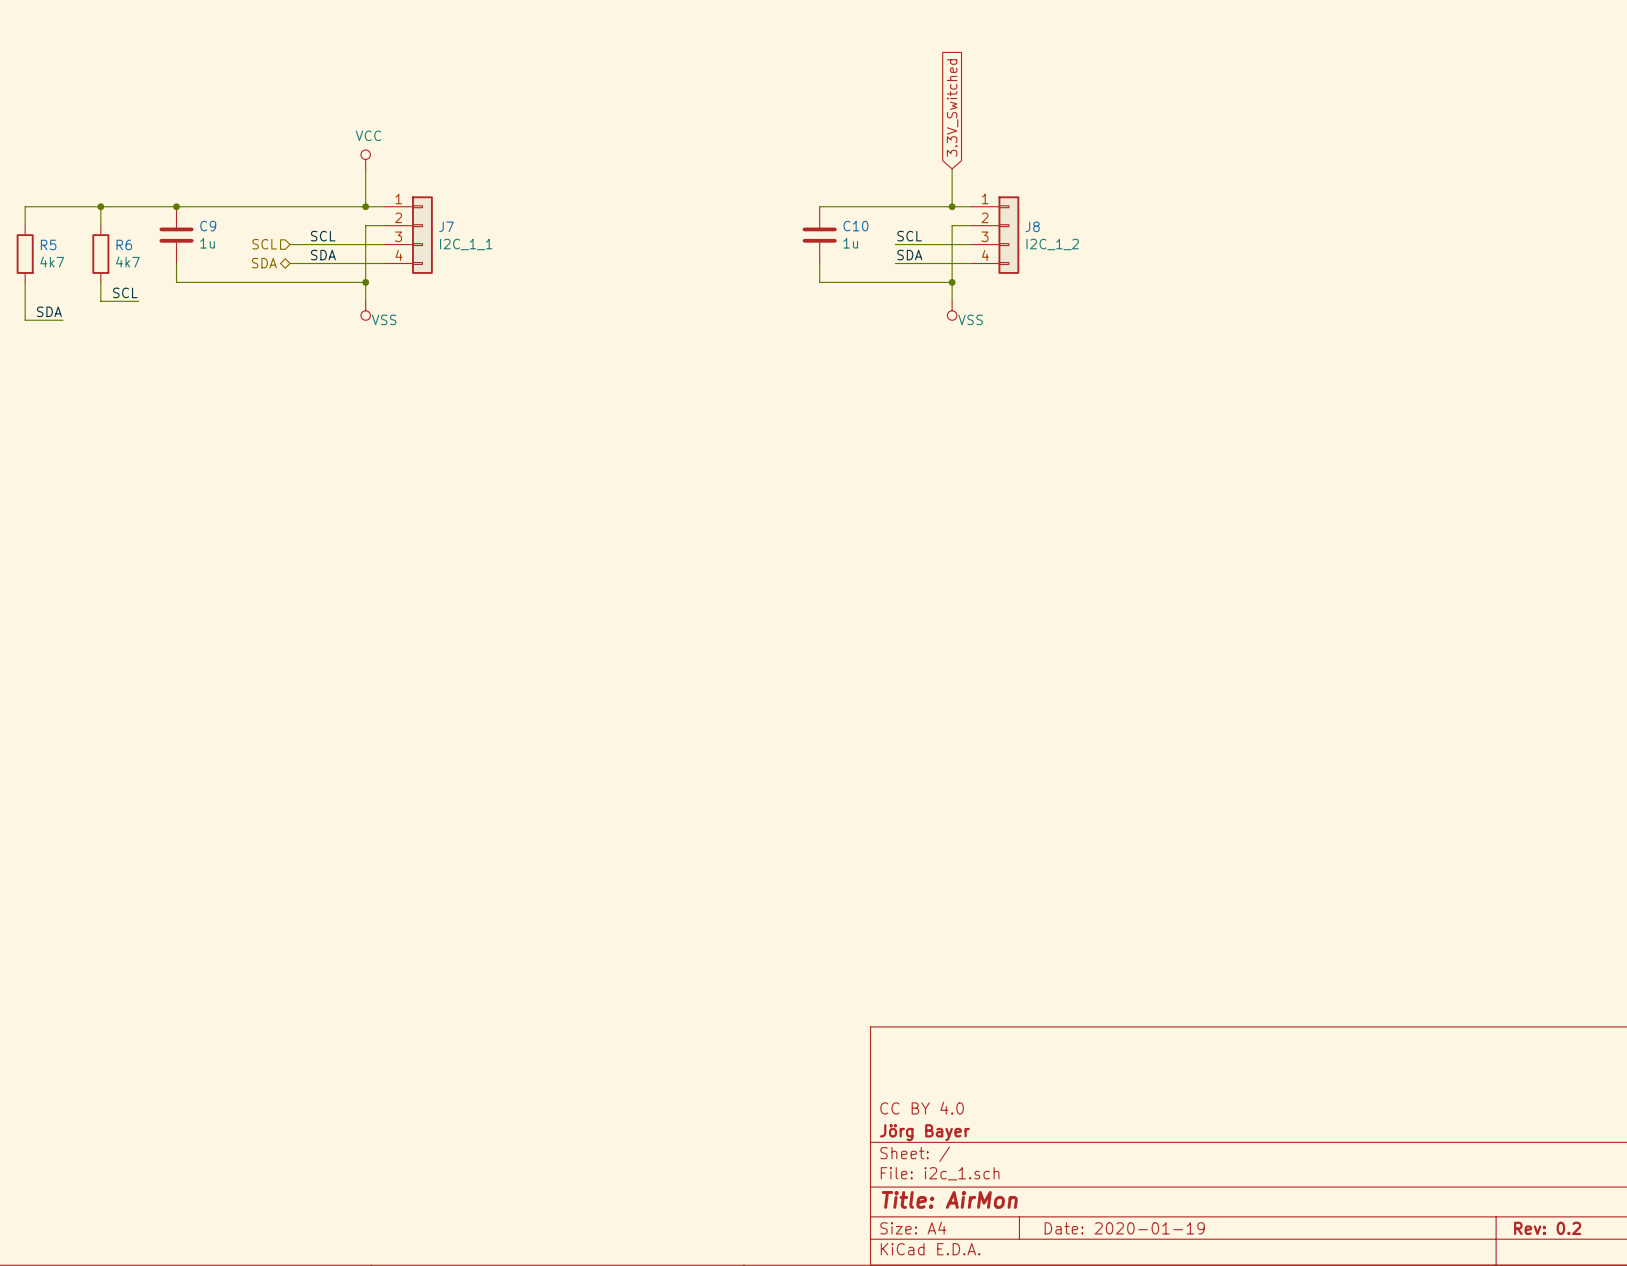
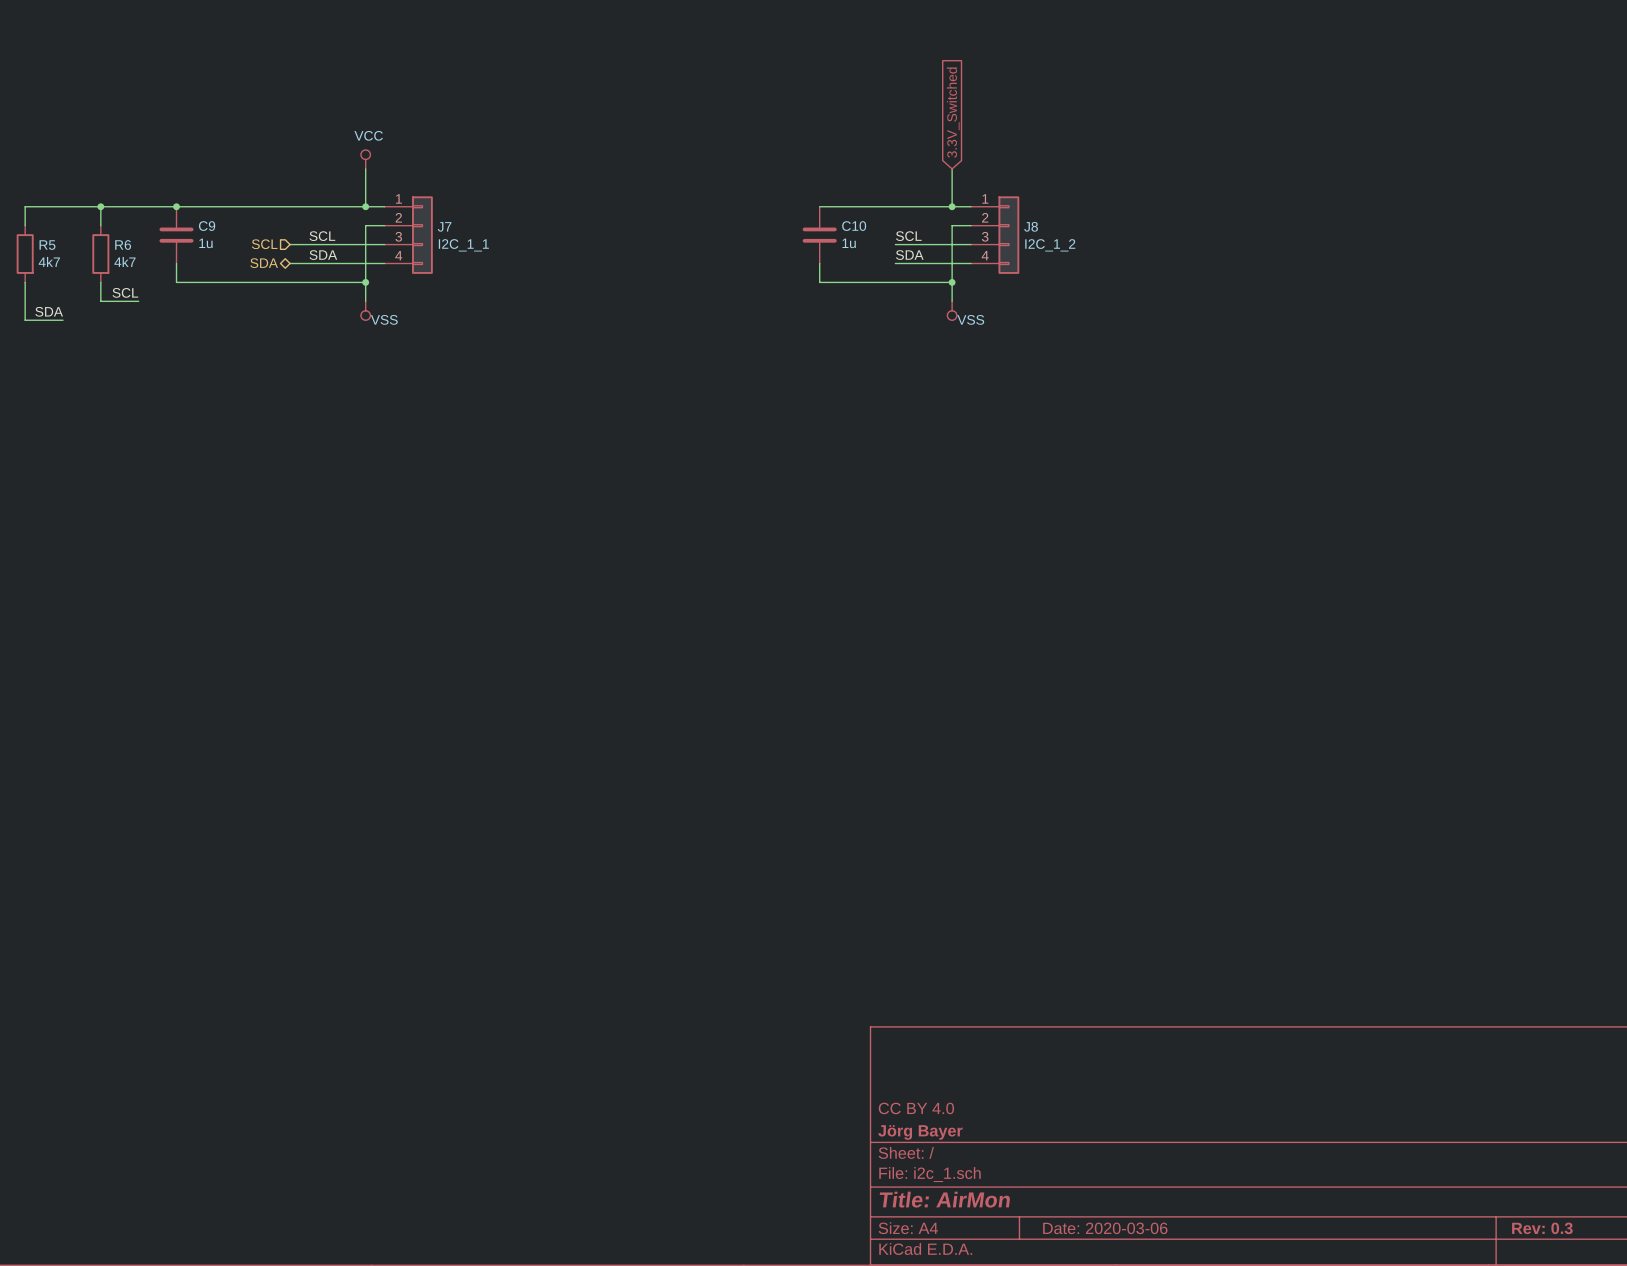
title block: Date: 2020-01-19 (1124, 1228) -> Date: 2020-03-06 (1105, 1228)
title block: Rev: 0.2 (1547, 1228) -> Rev: 0.3 (1542, 1228)

